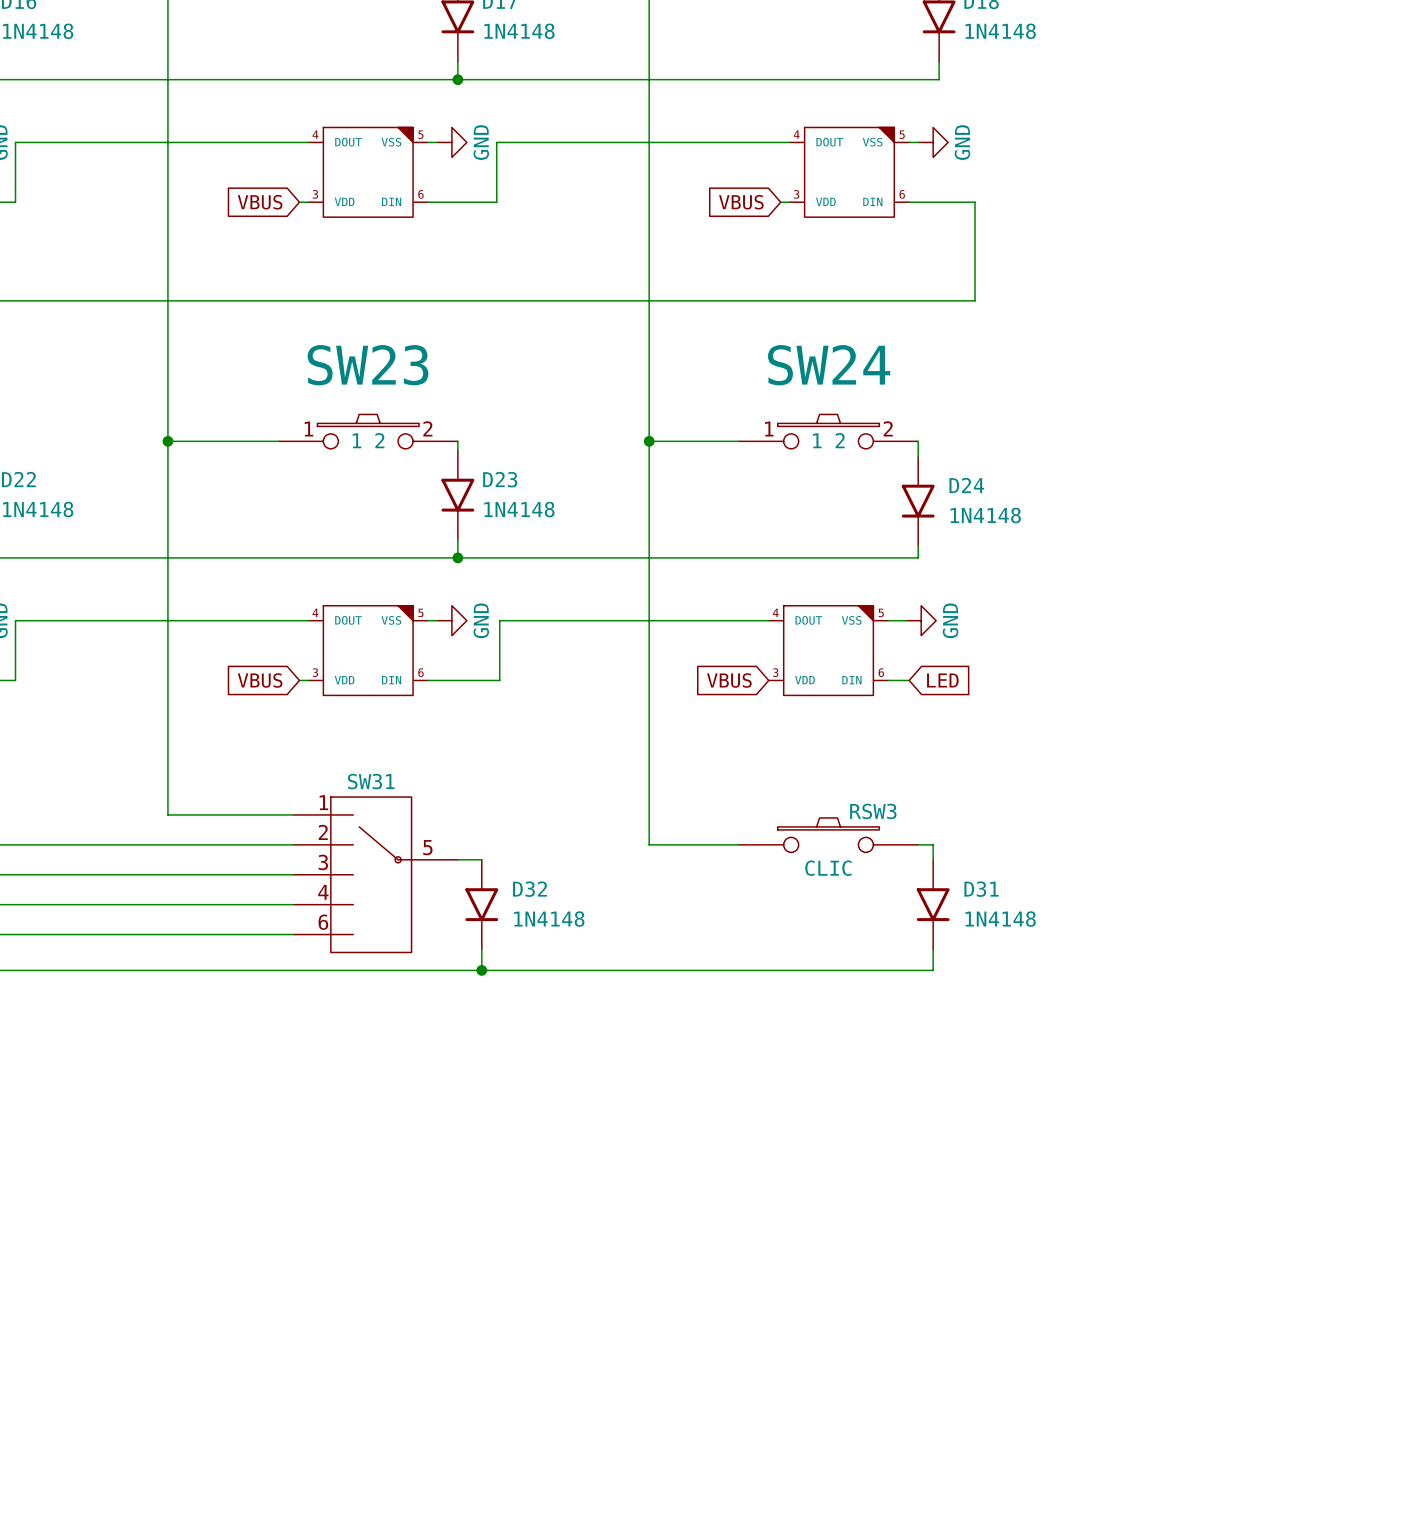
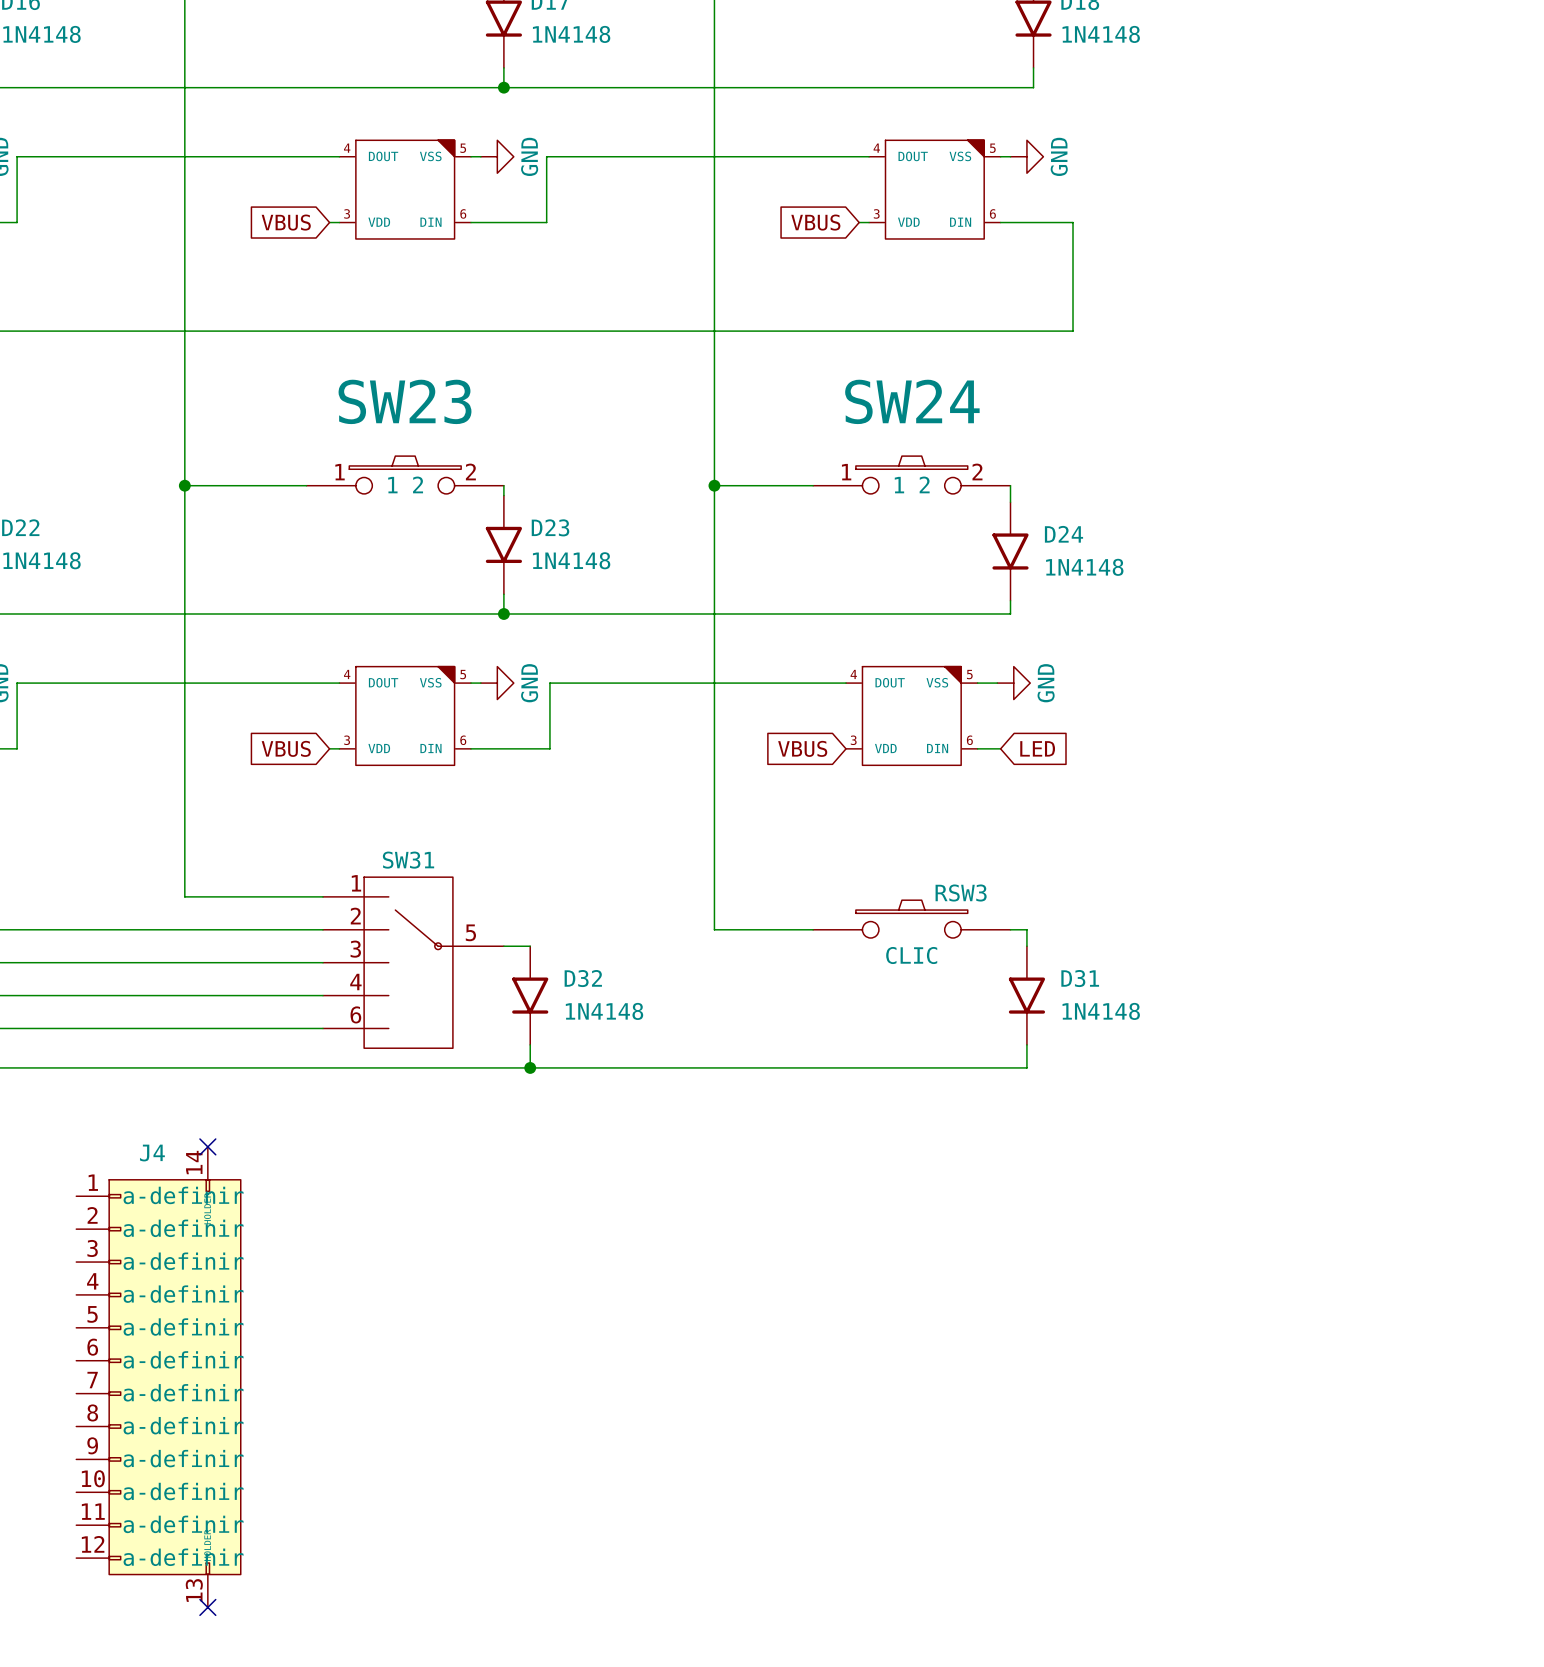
no-connect mark: none -> (207, 1146)
J4: none -> (158, 1377)
no-connect mark: none -> (207, 1607)

